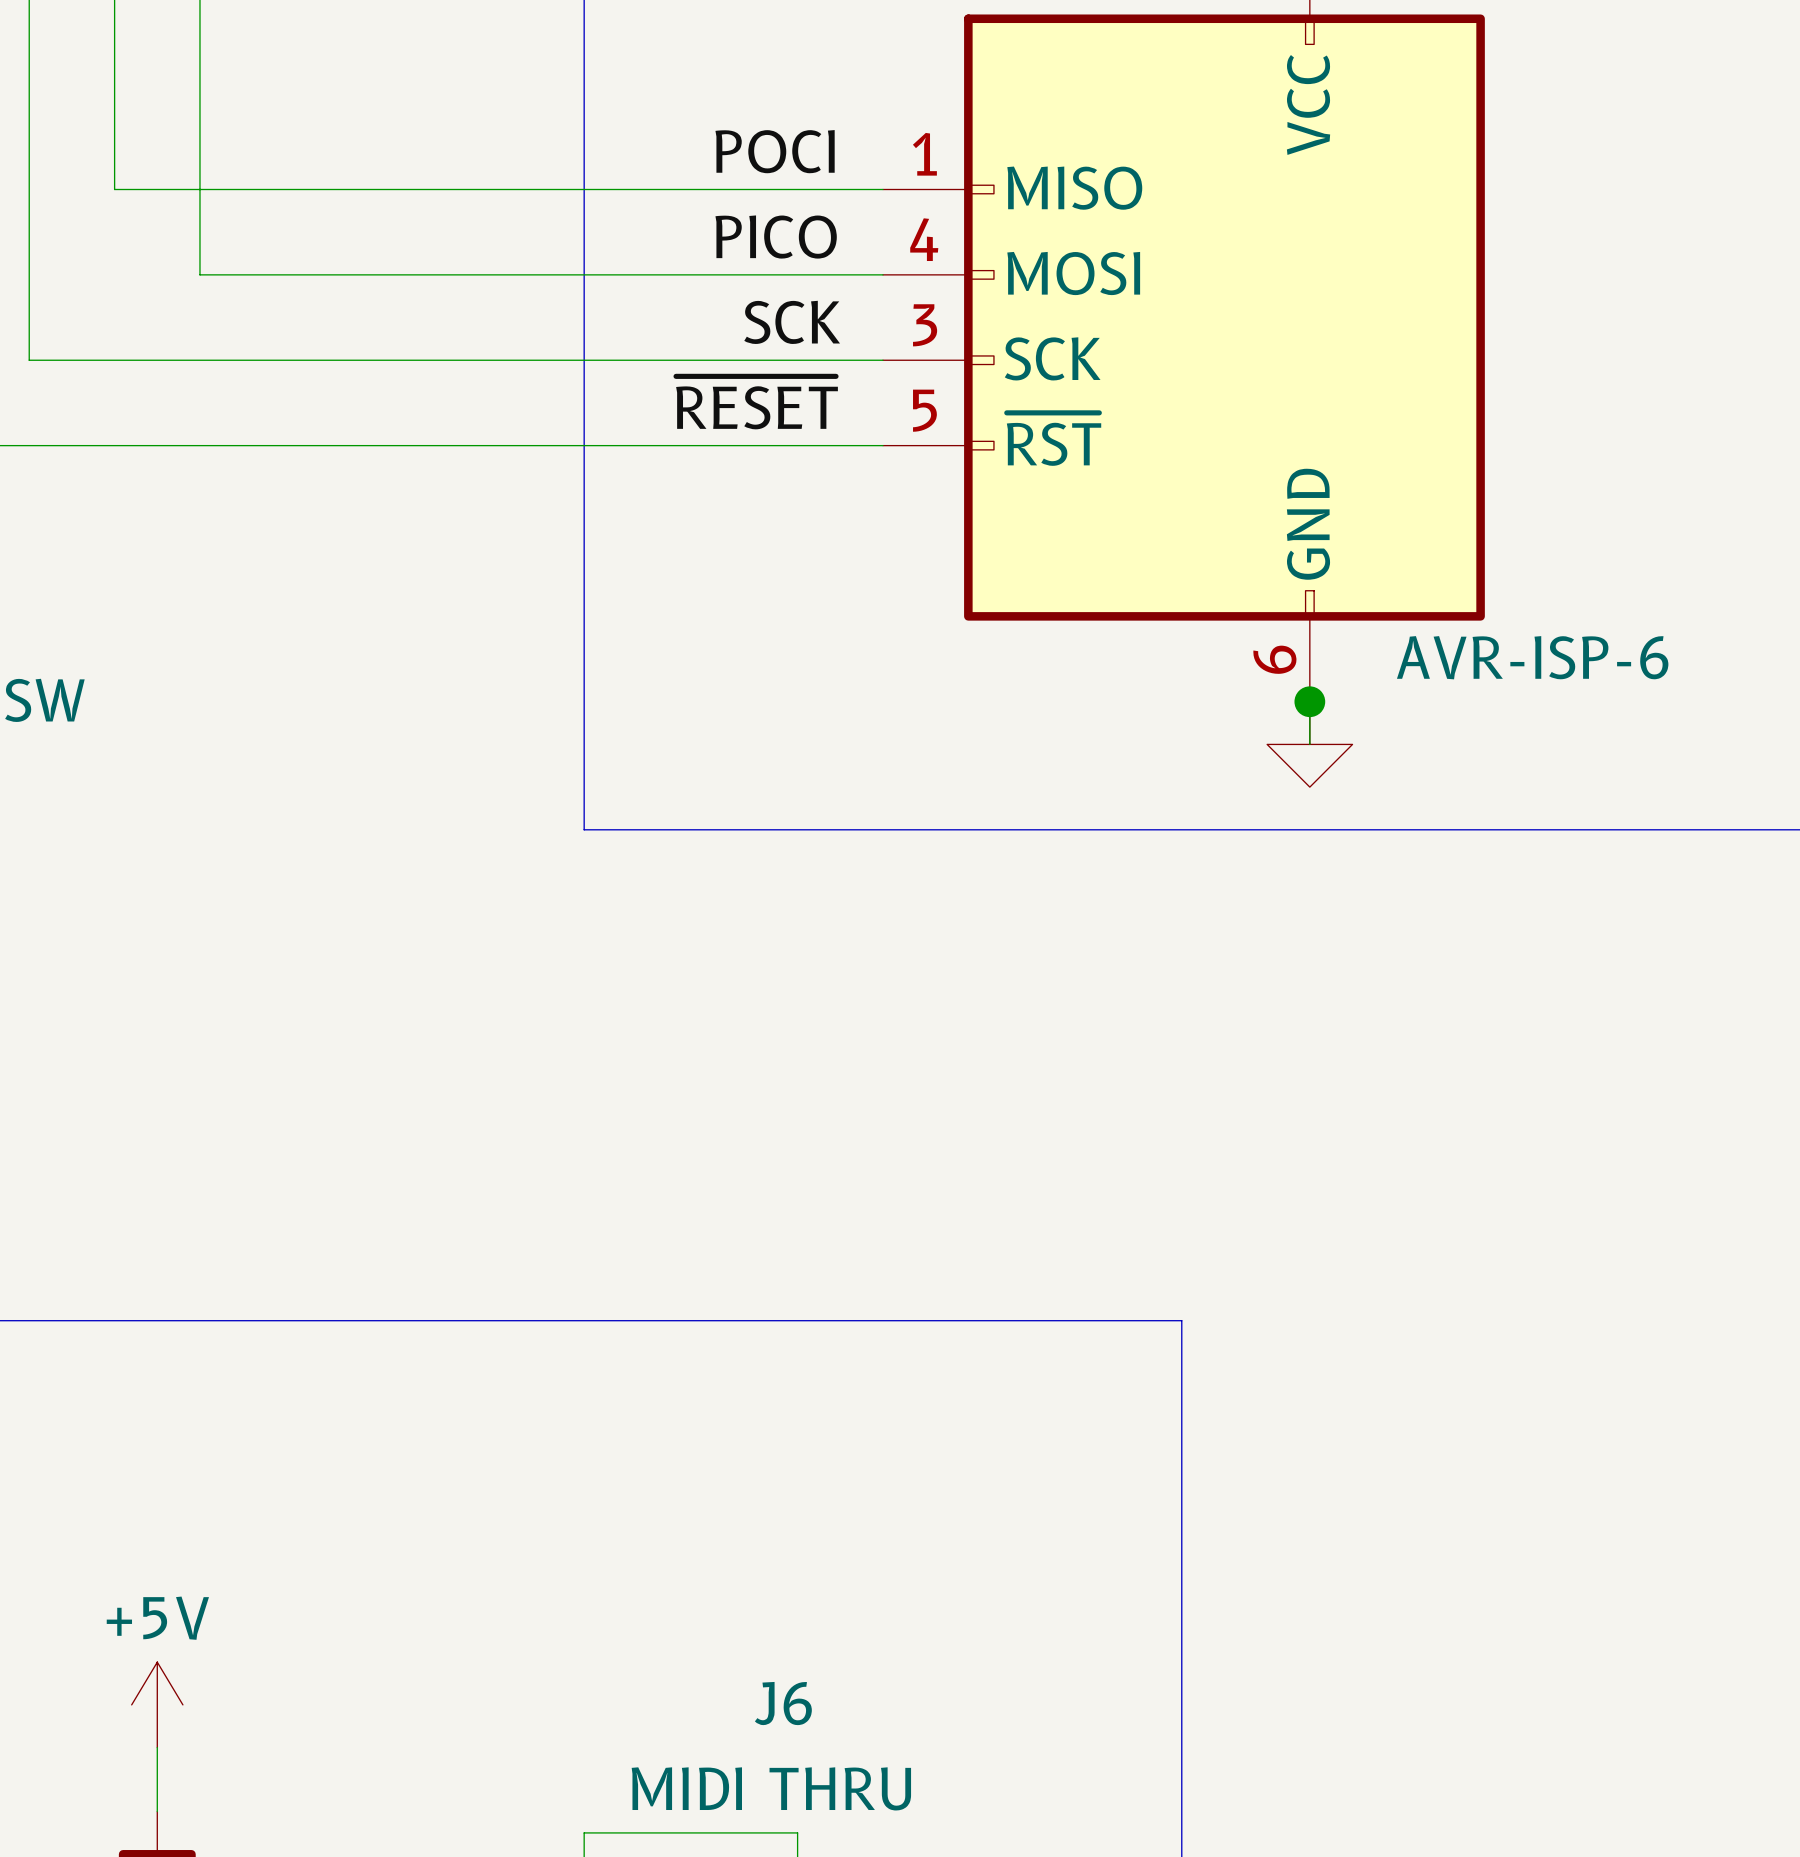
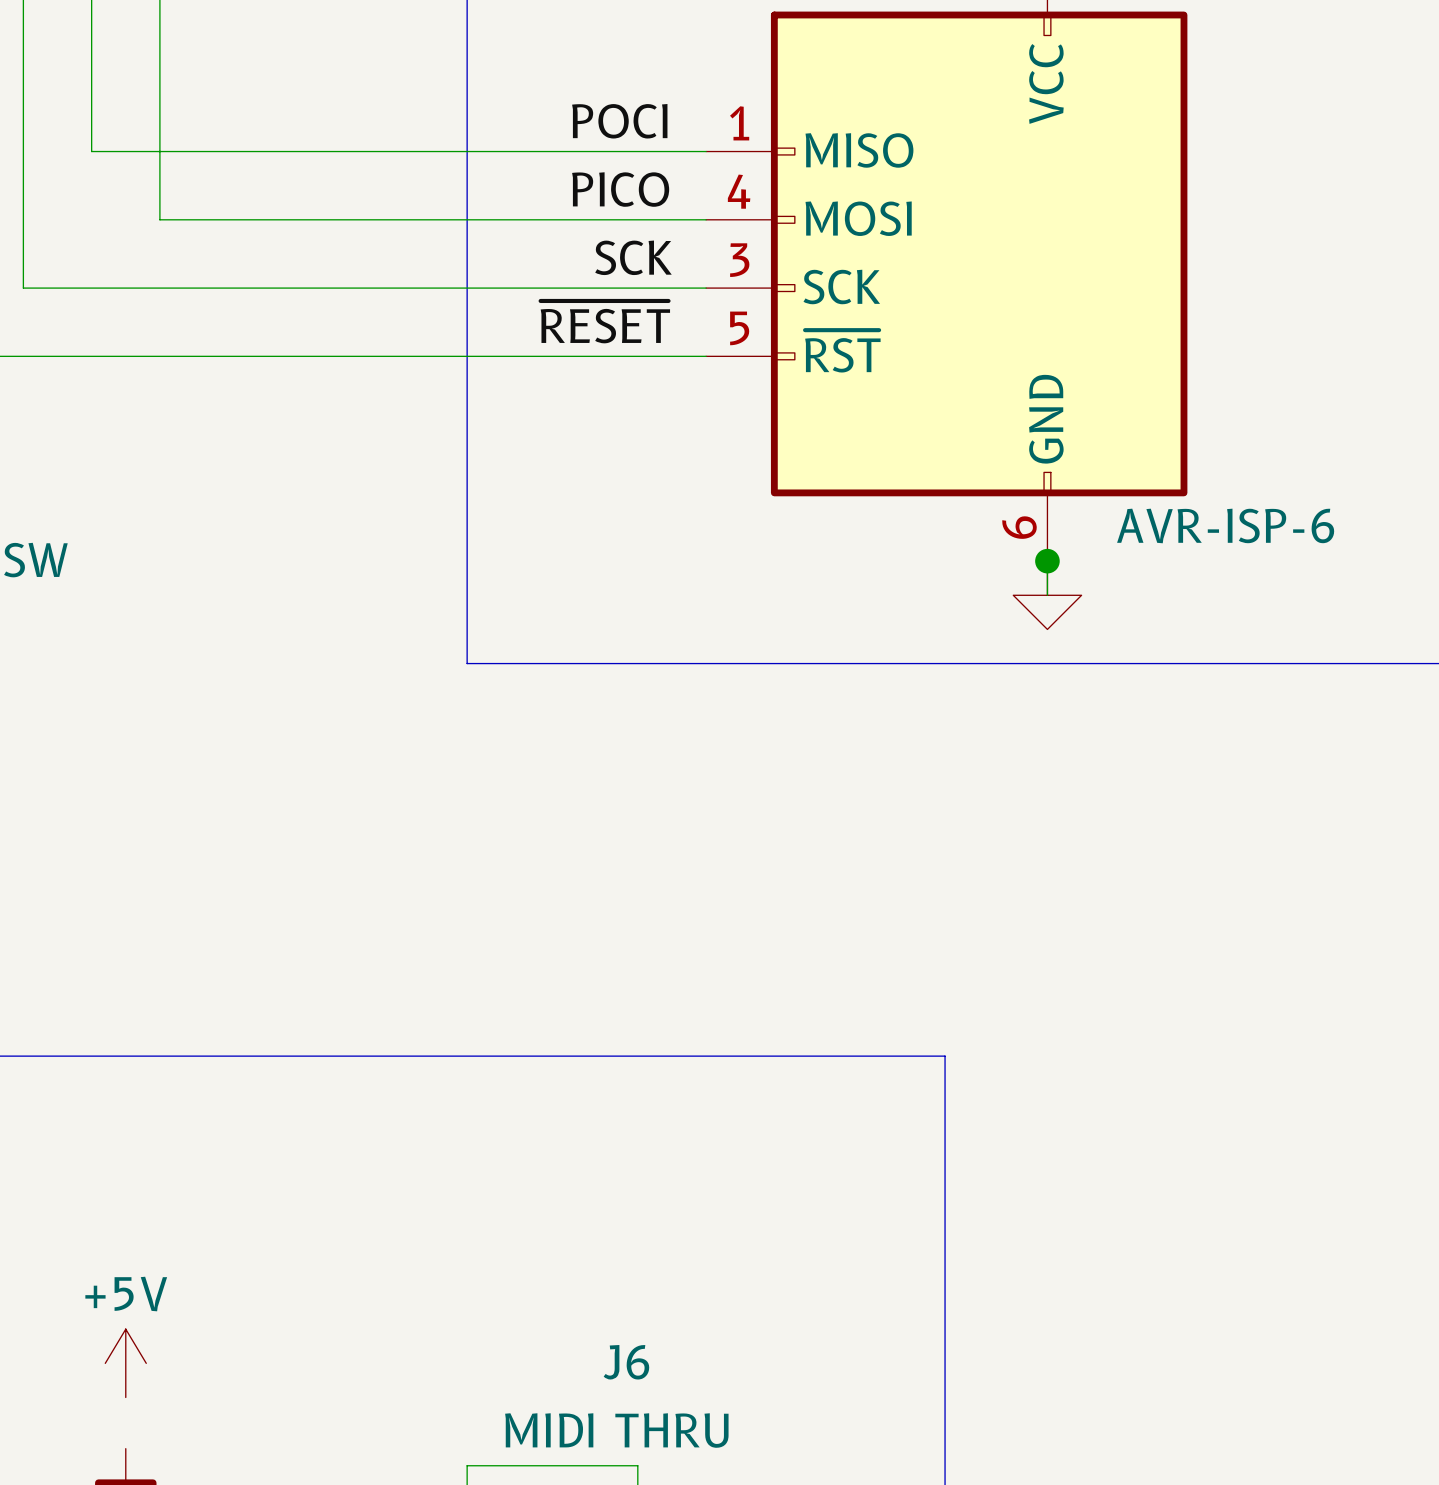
wire: (157, 1747) (157, 1811) -> none

